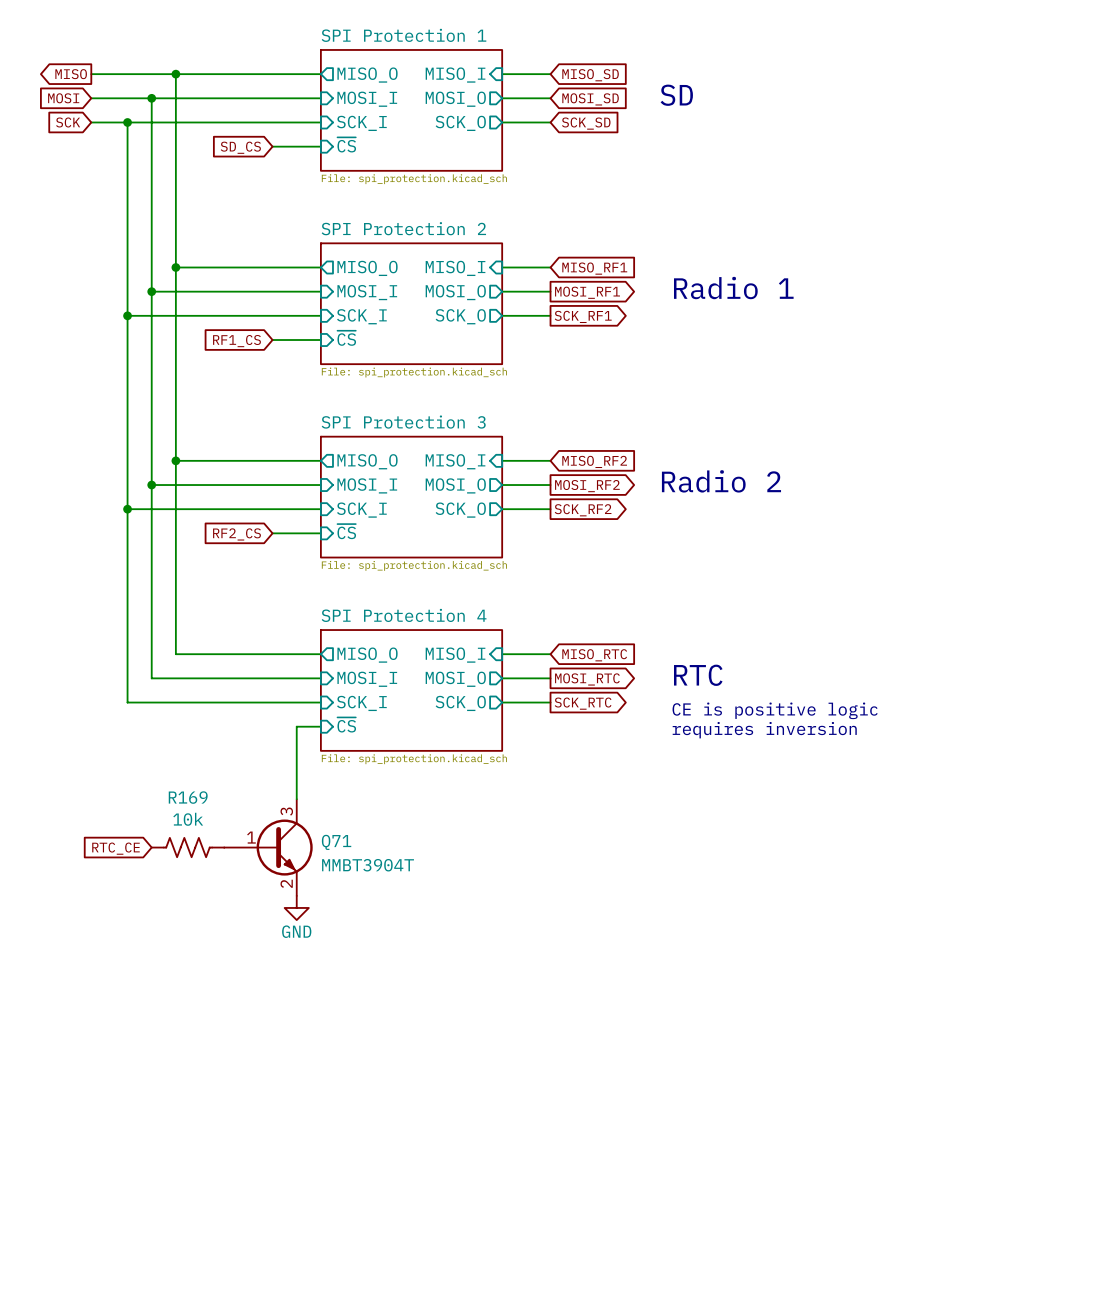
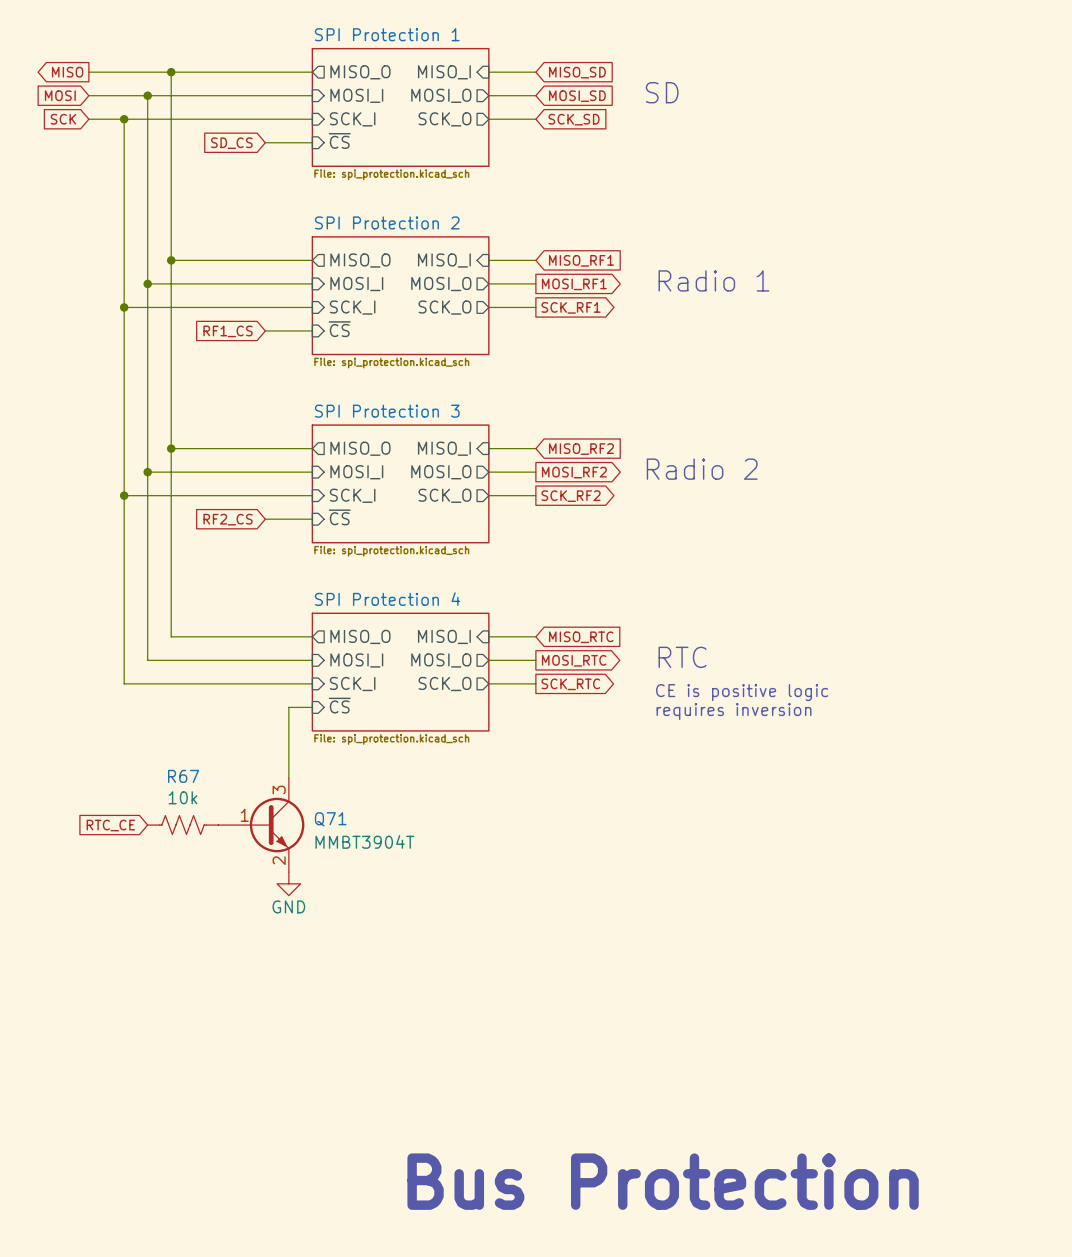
R169 name: R169 (188, 797) -> R67 (183, 776)
text: none -> Bus Protection (663, 1181)

